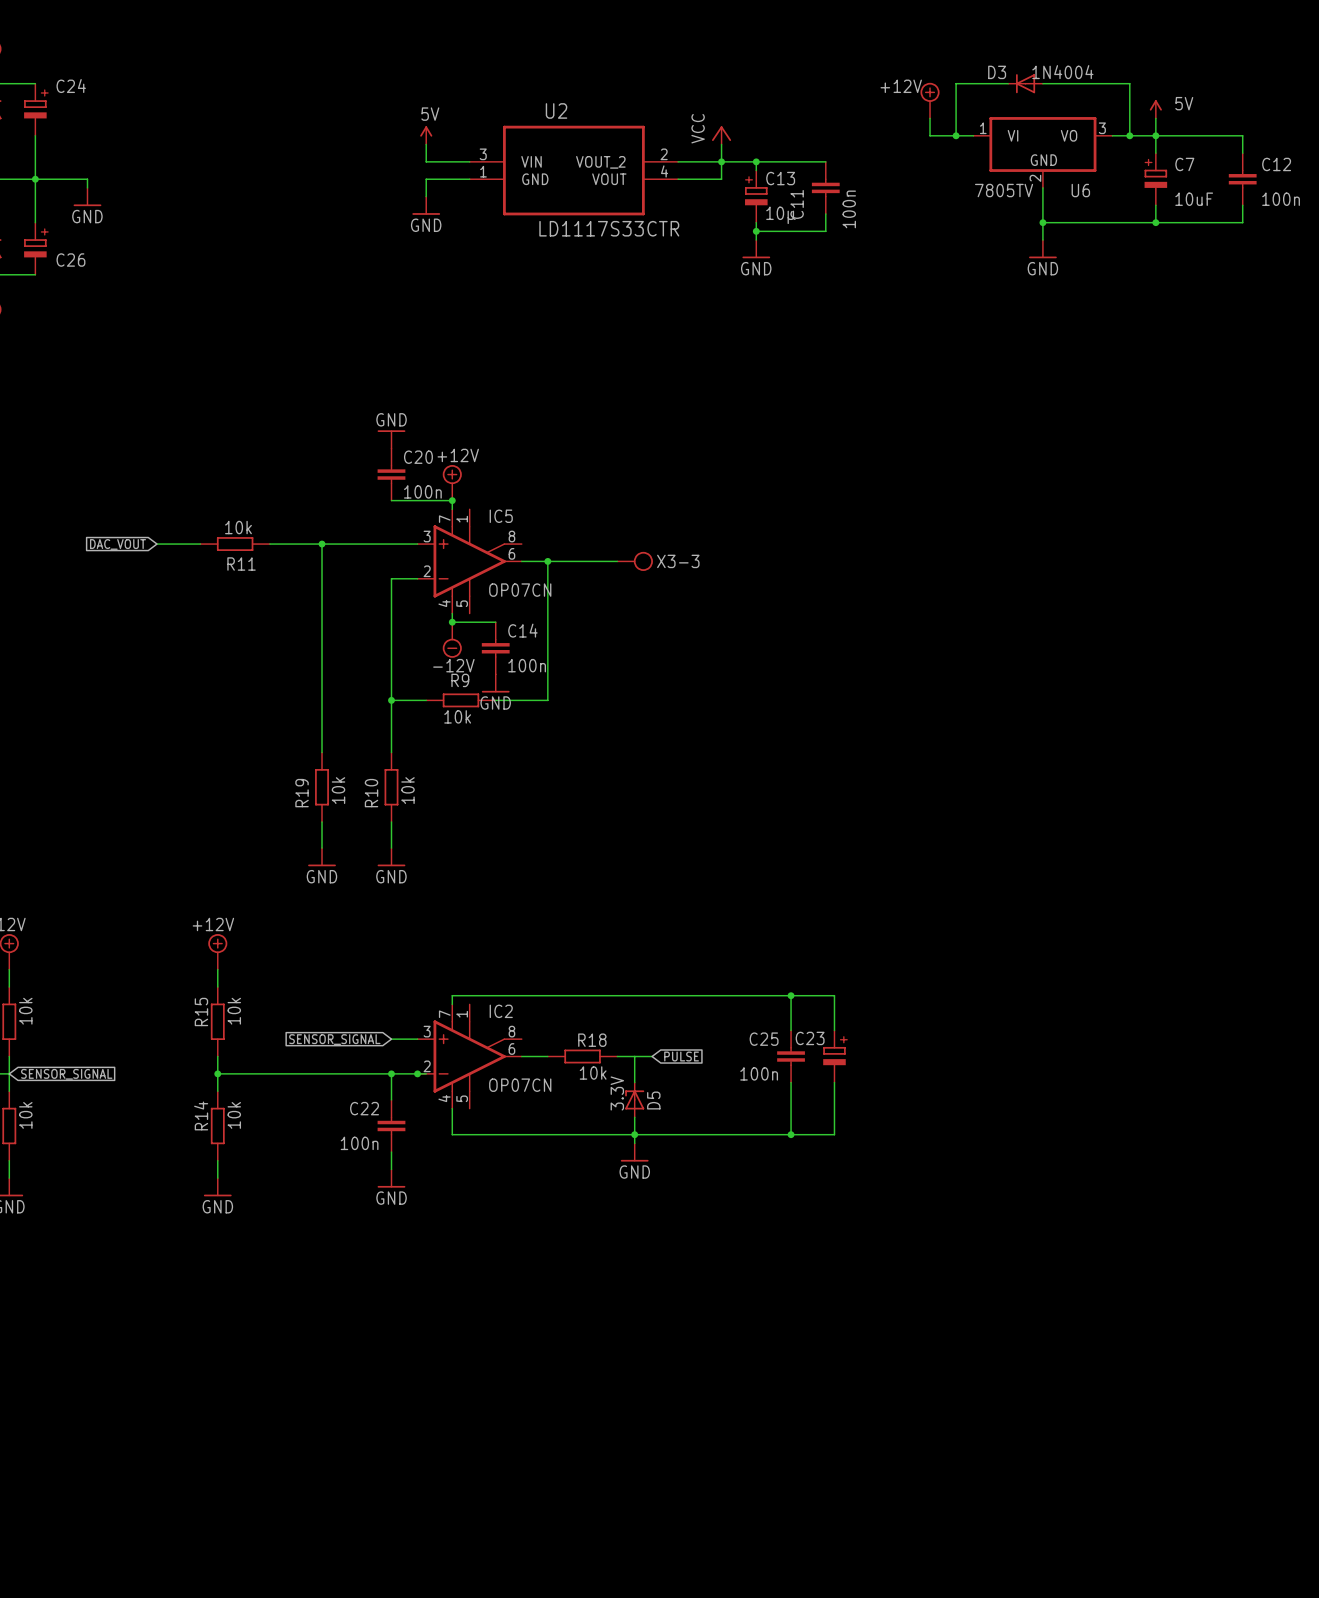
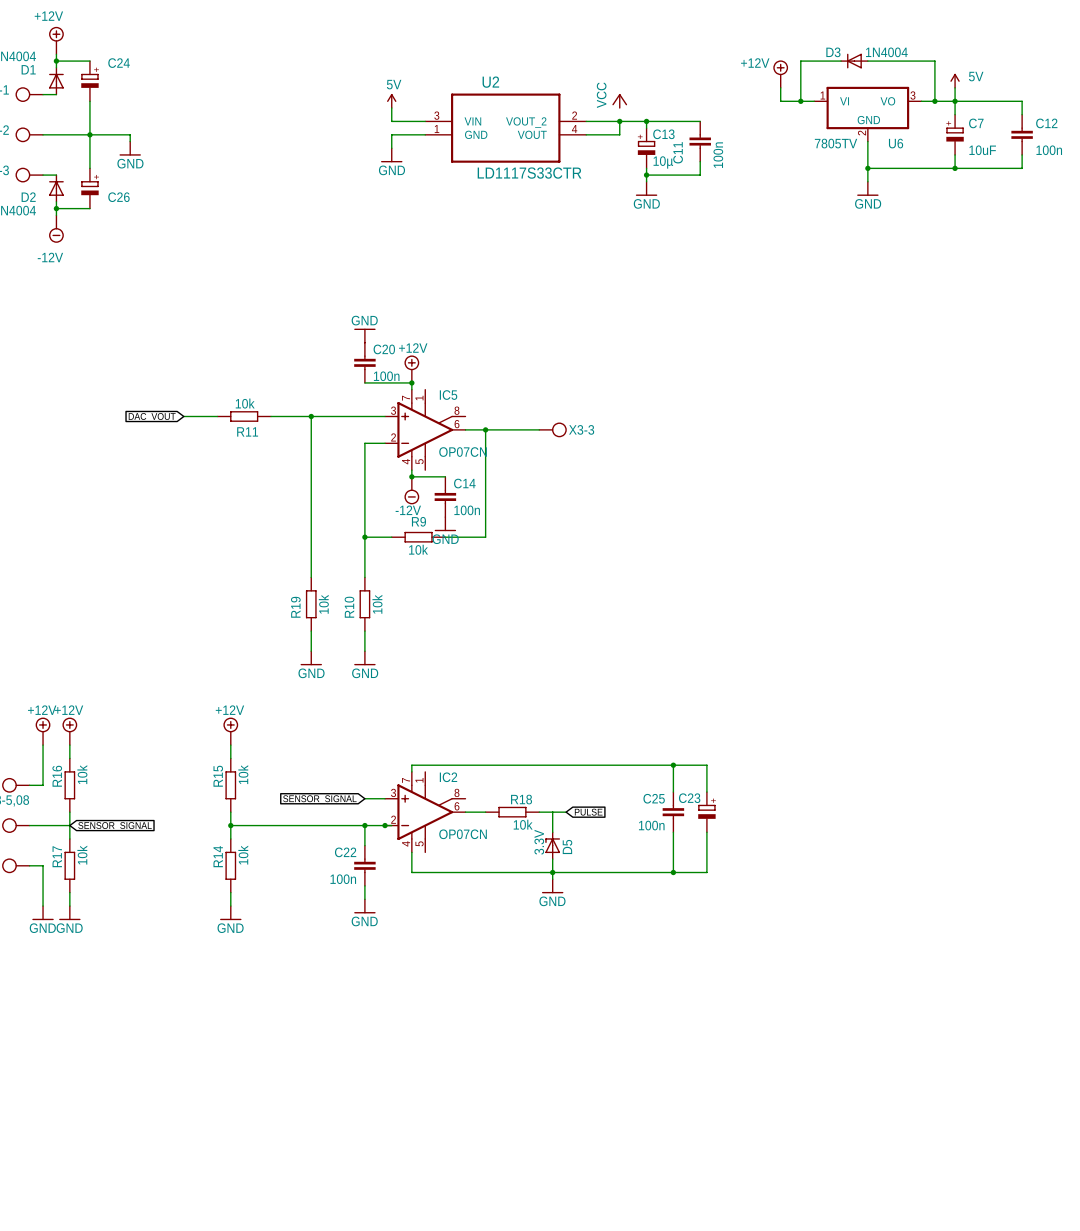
wire: (721, 144) (721, 161) -> none

